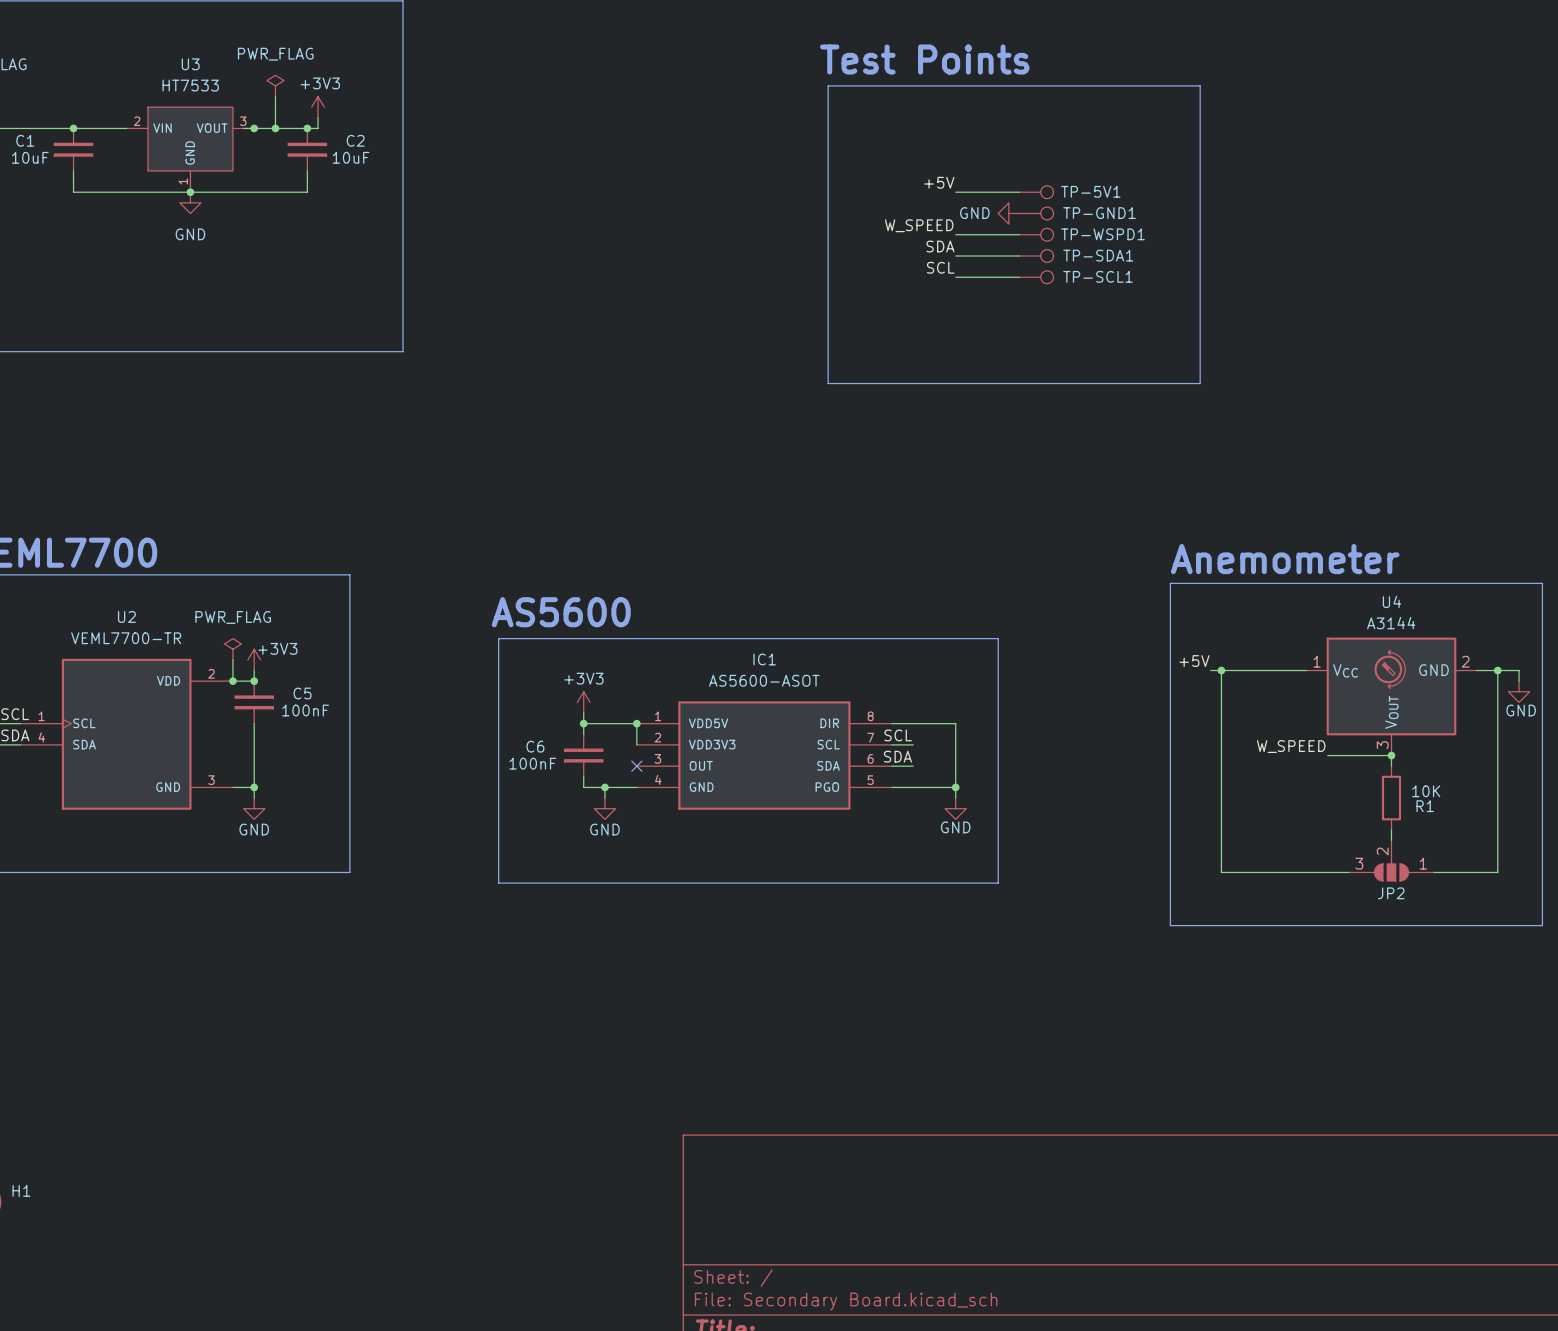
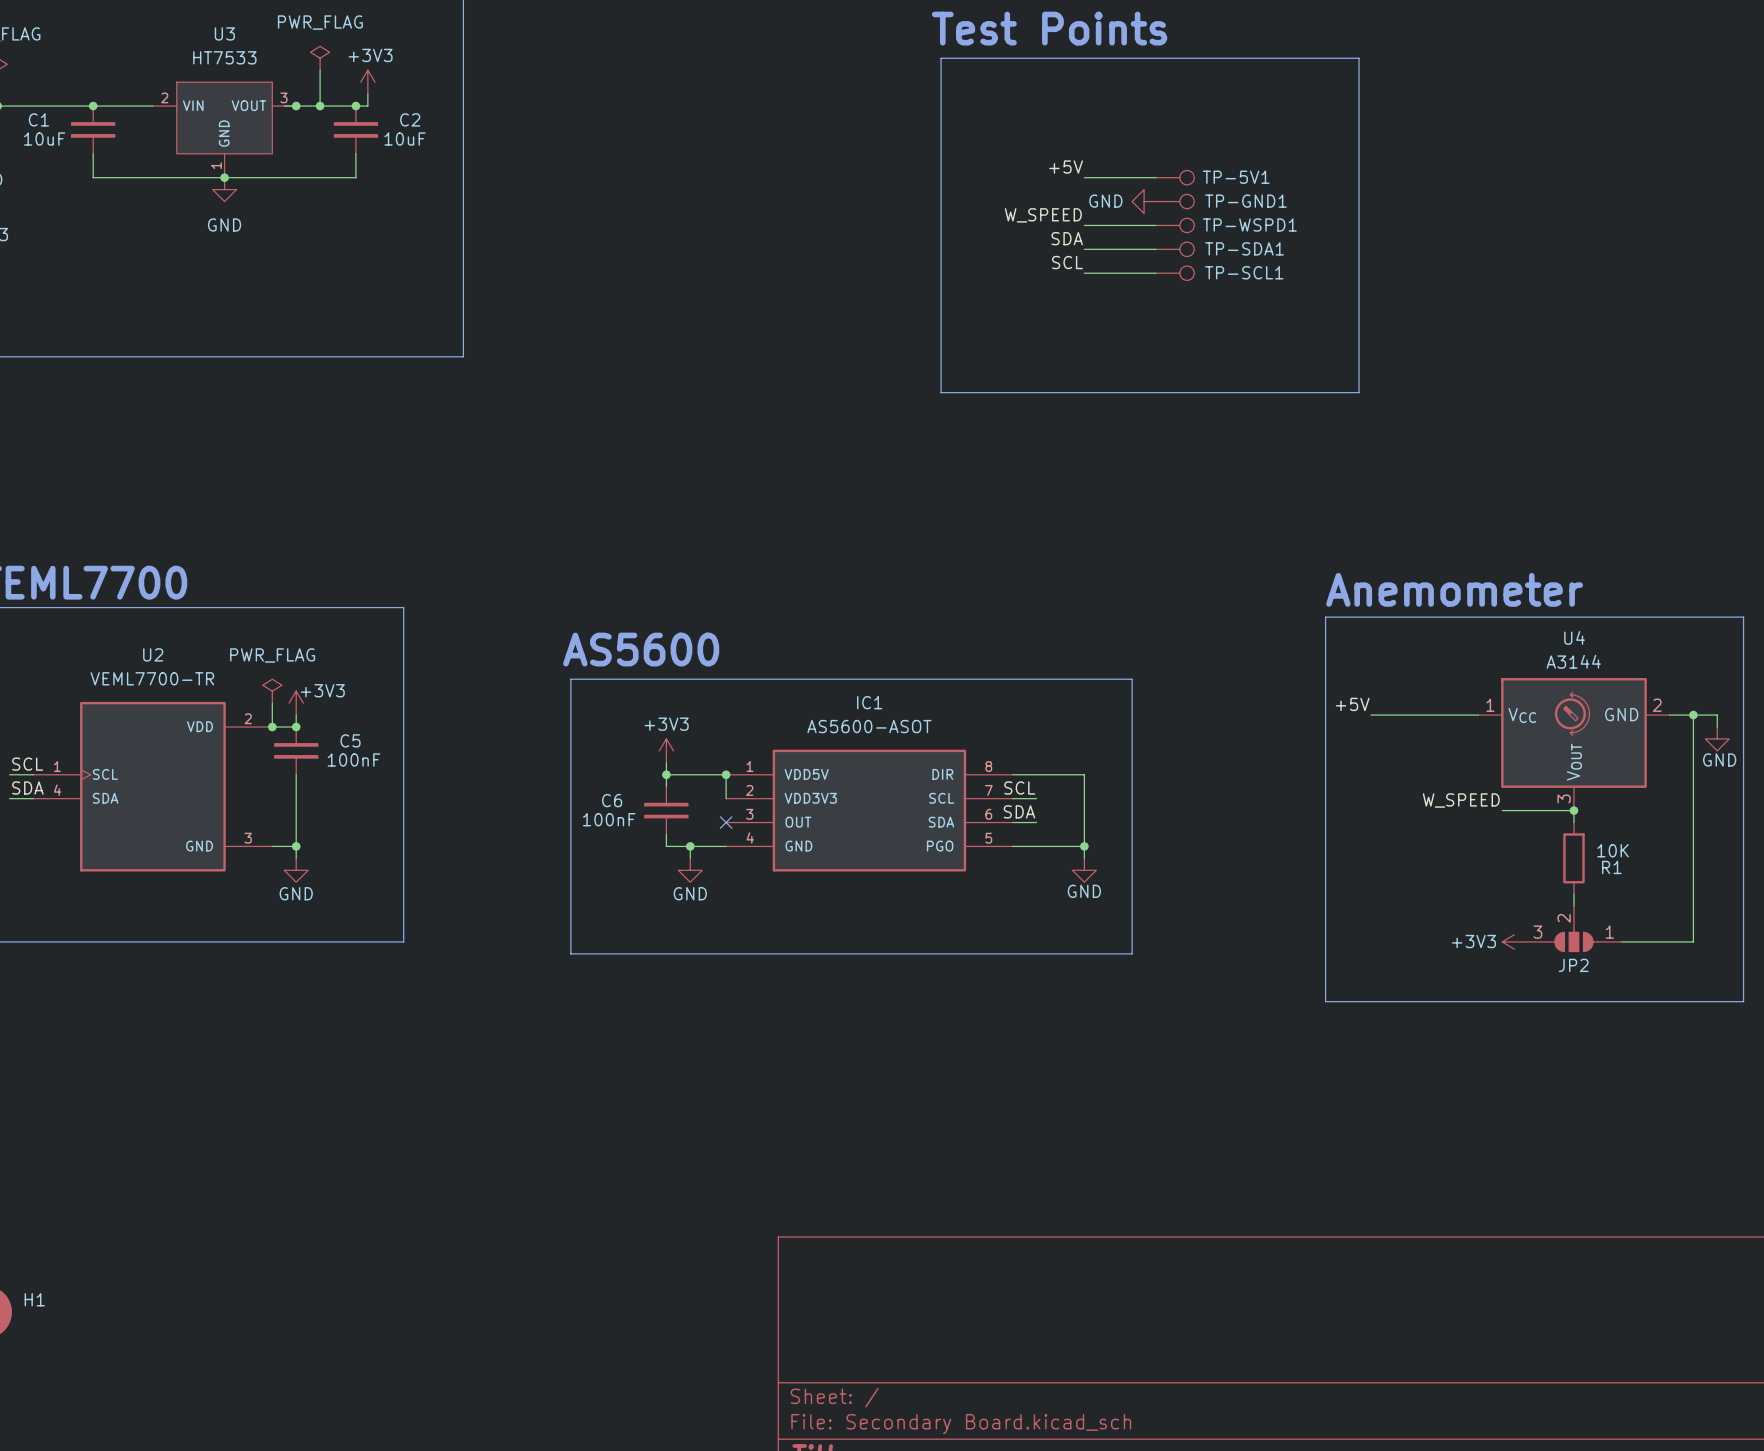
wire: (1221, 670) (1221, 872) (1348, 872) -> none
junction: (1221, 670) -> none
power symbol: none -> +3V3 (1514, 941)

